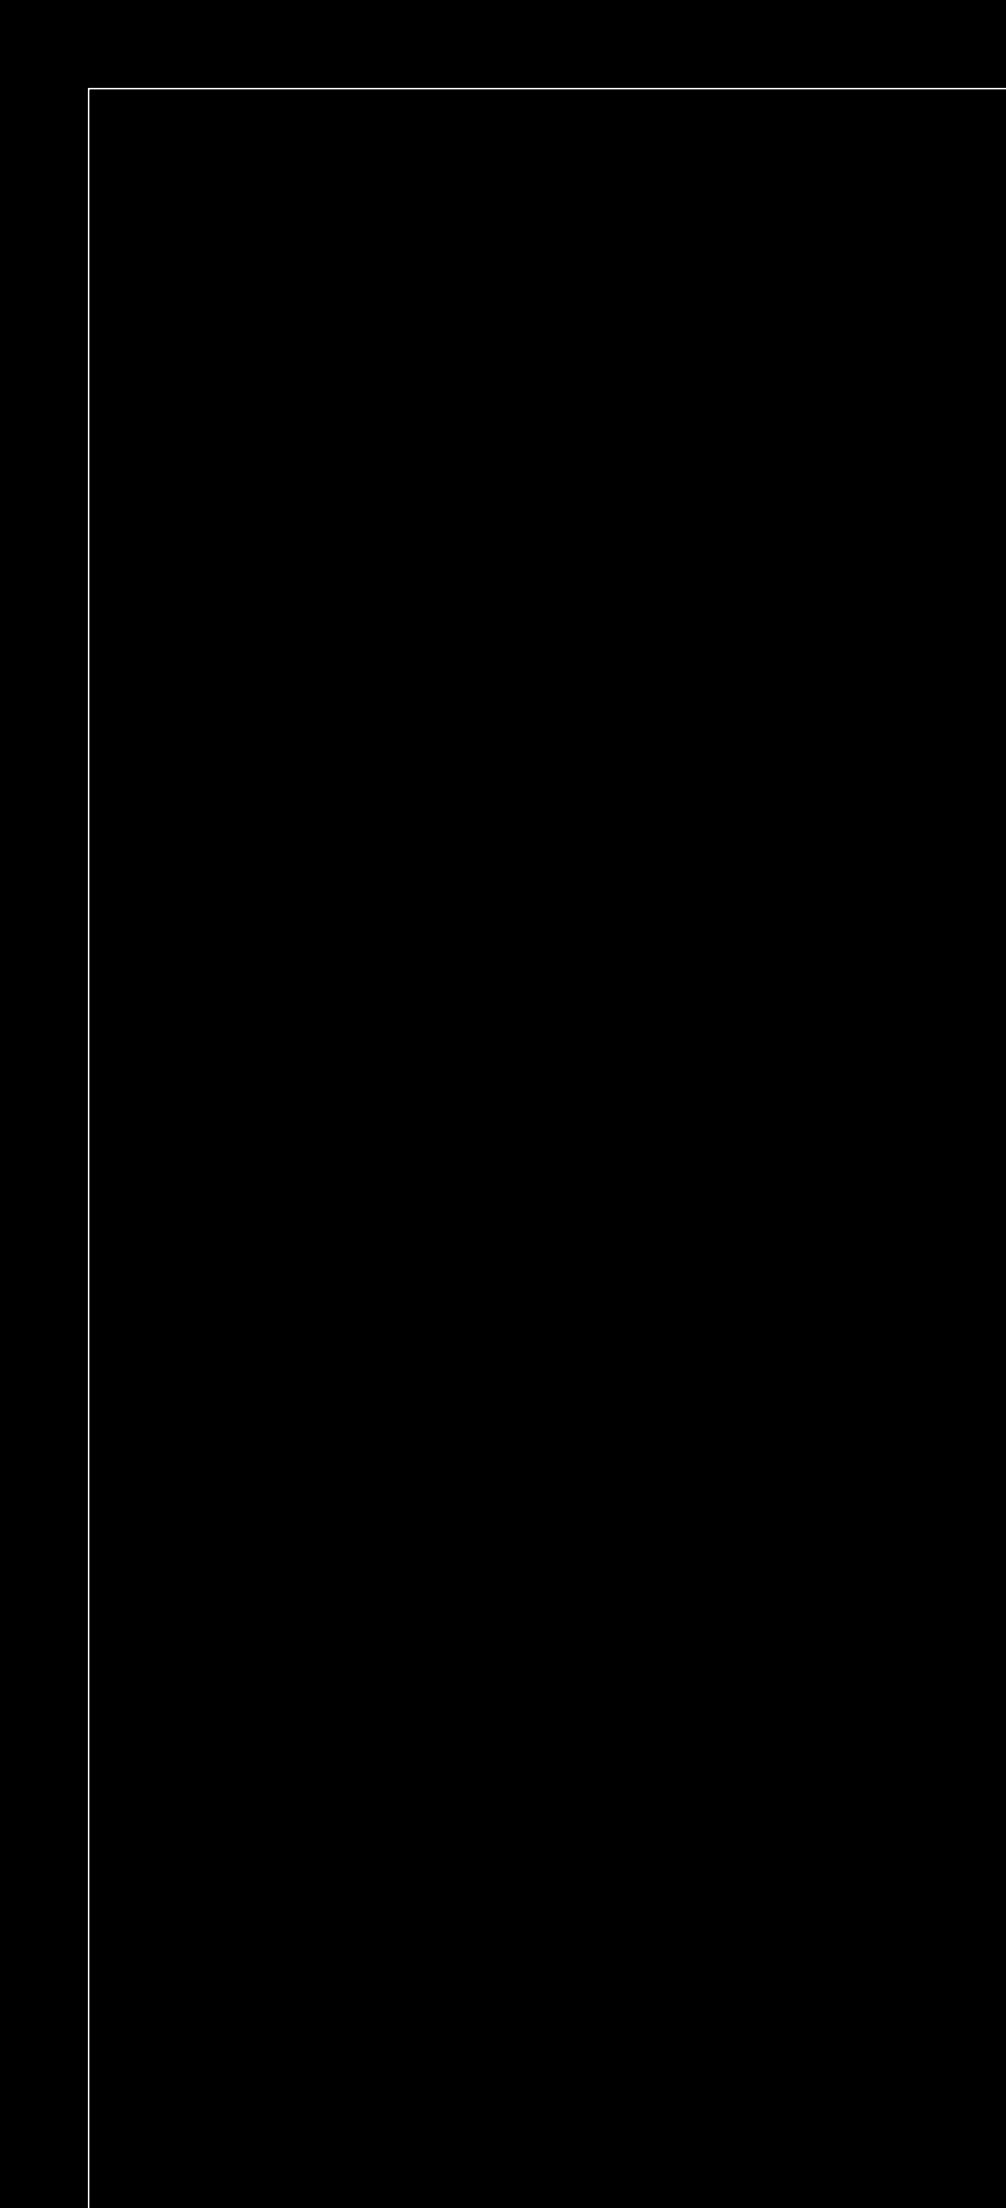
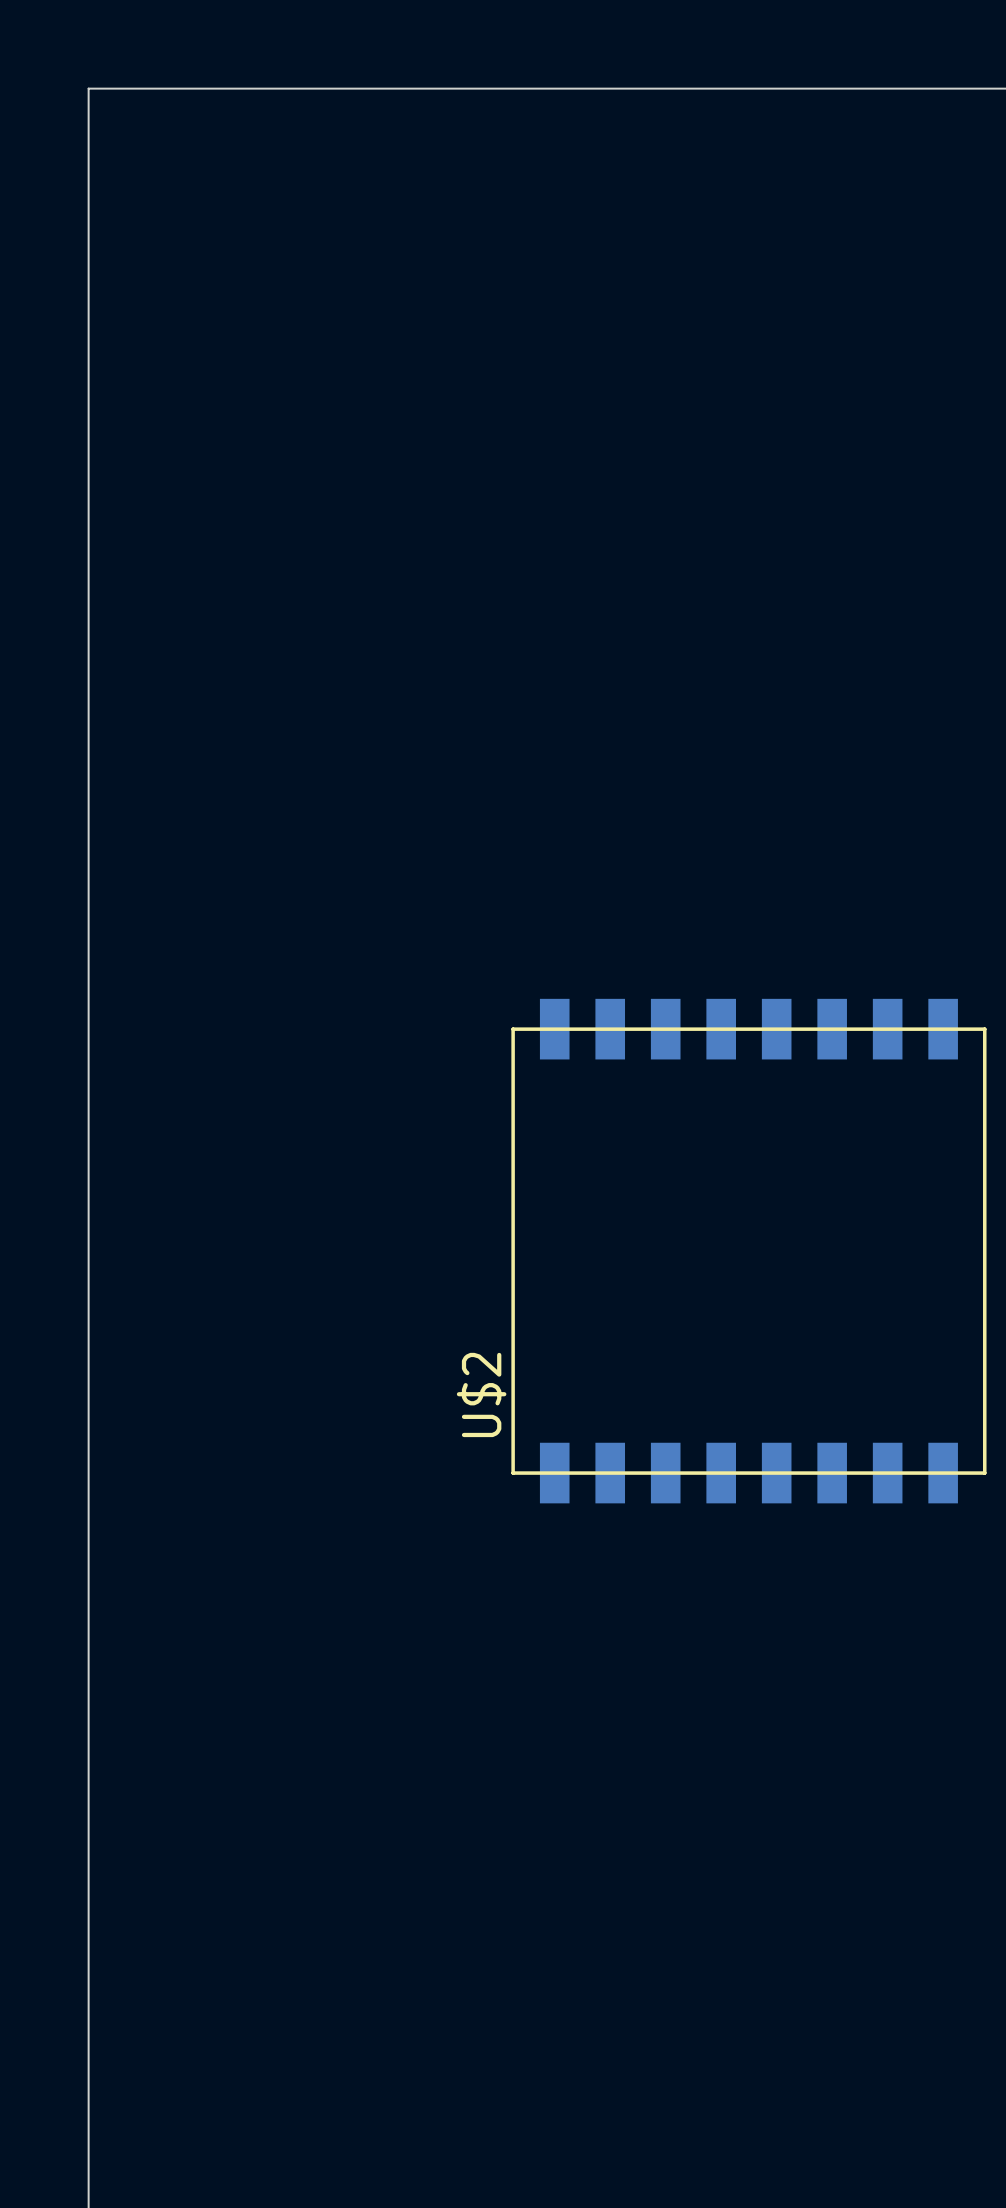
U$2: none -> (748, 1251)

